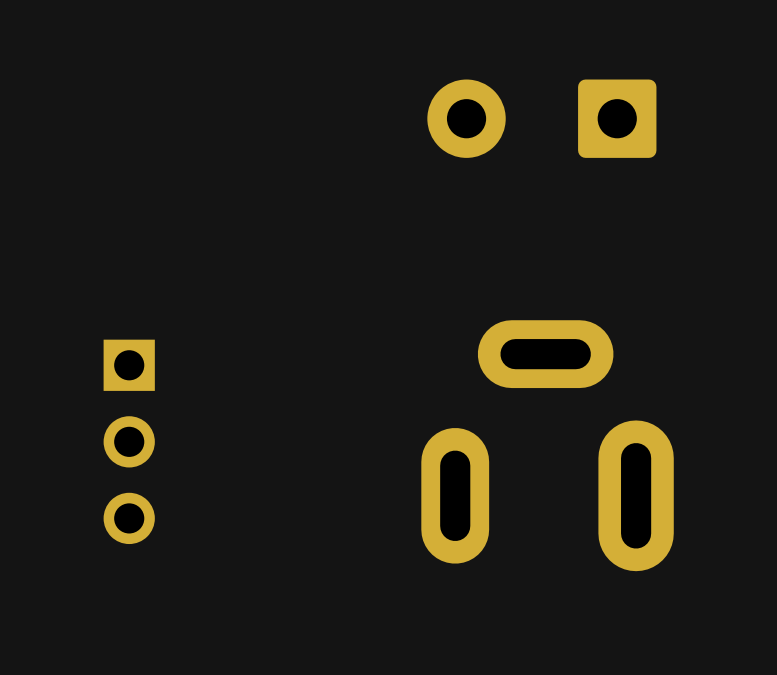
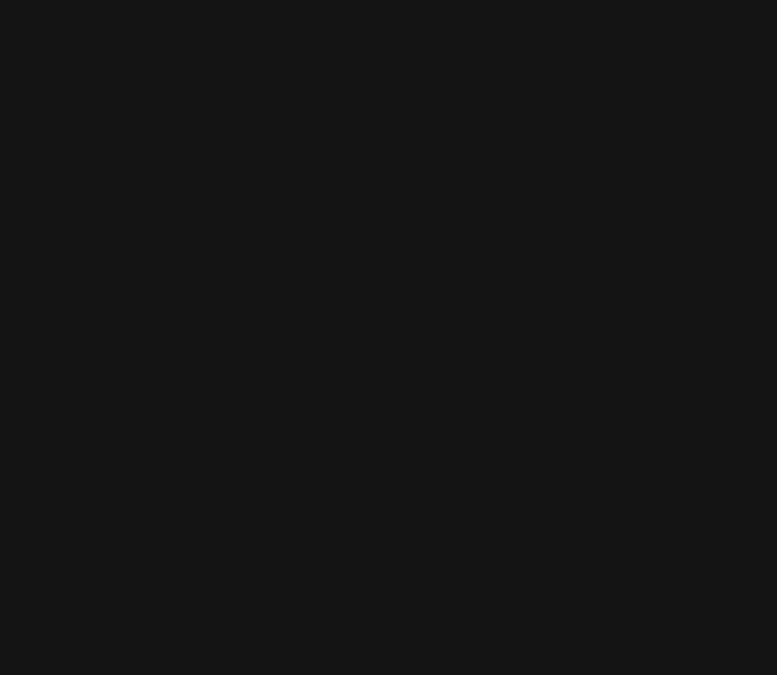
part: (541, 118) -> none
part: (129, 441) -> none
part: (547, 445) -> none

